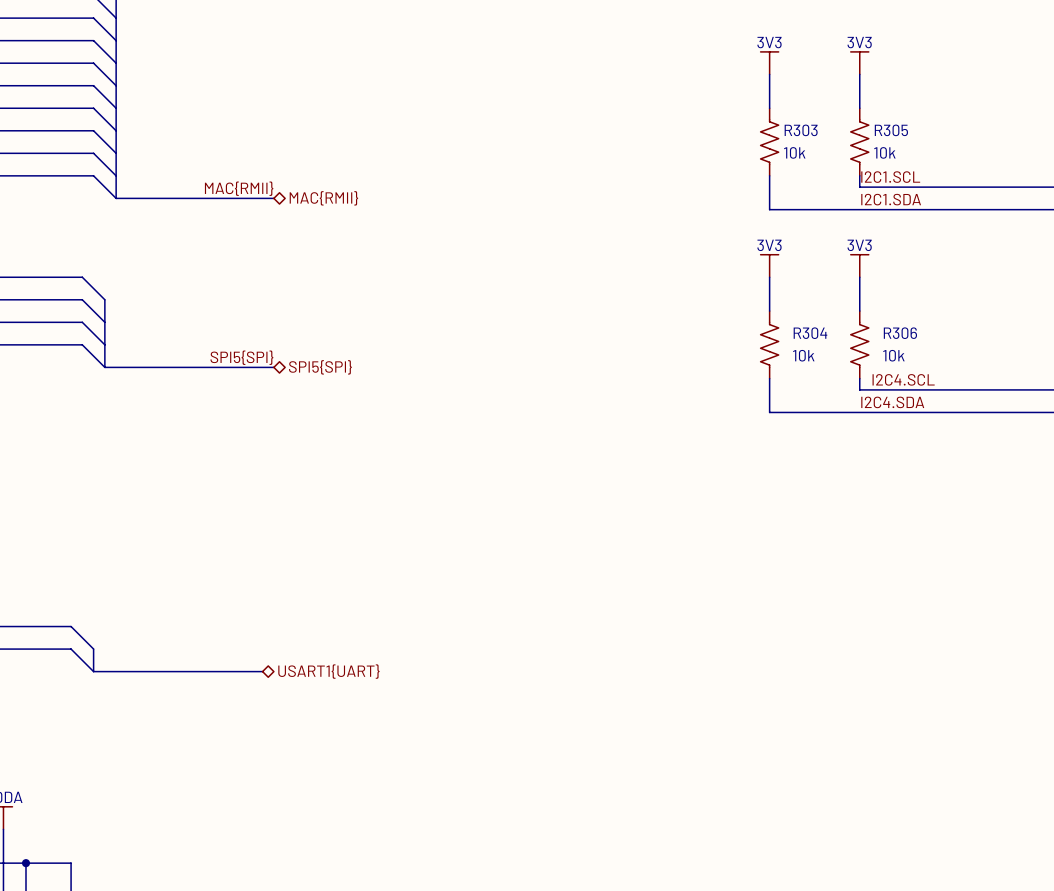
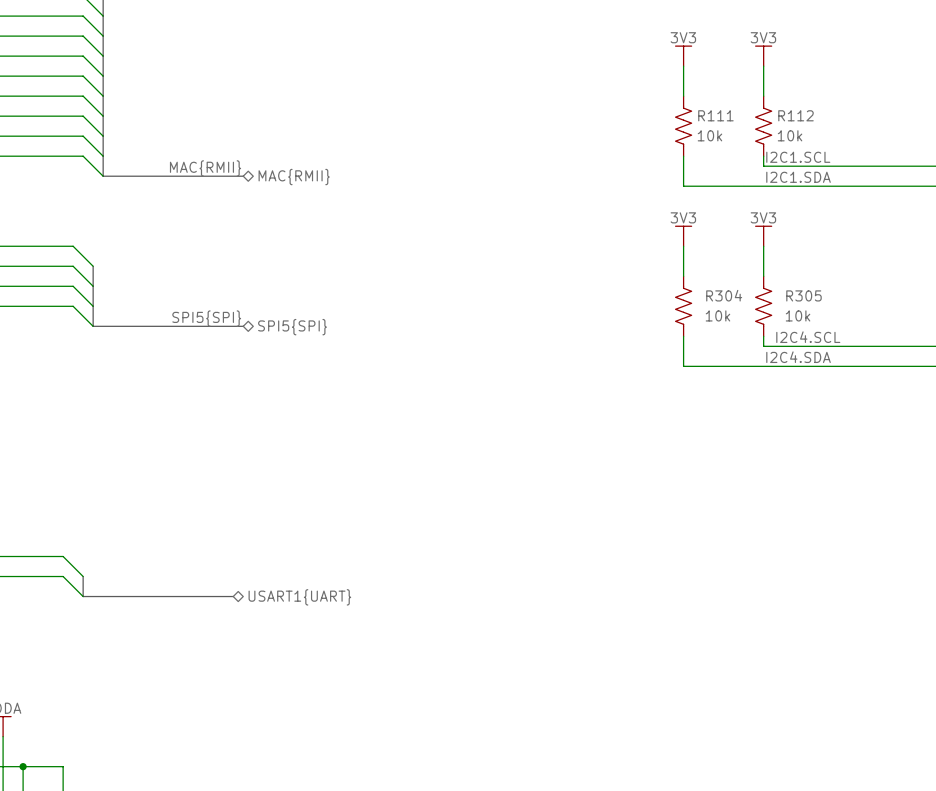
R303 name: R303 (801, 130) -> R111 (715, 115)
R305 name: R305 (891, 130) -> R112 (795, 115)
R306 name: R306 (900, 333) -> R305 (803, 295)

